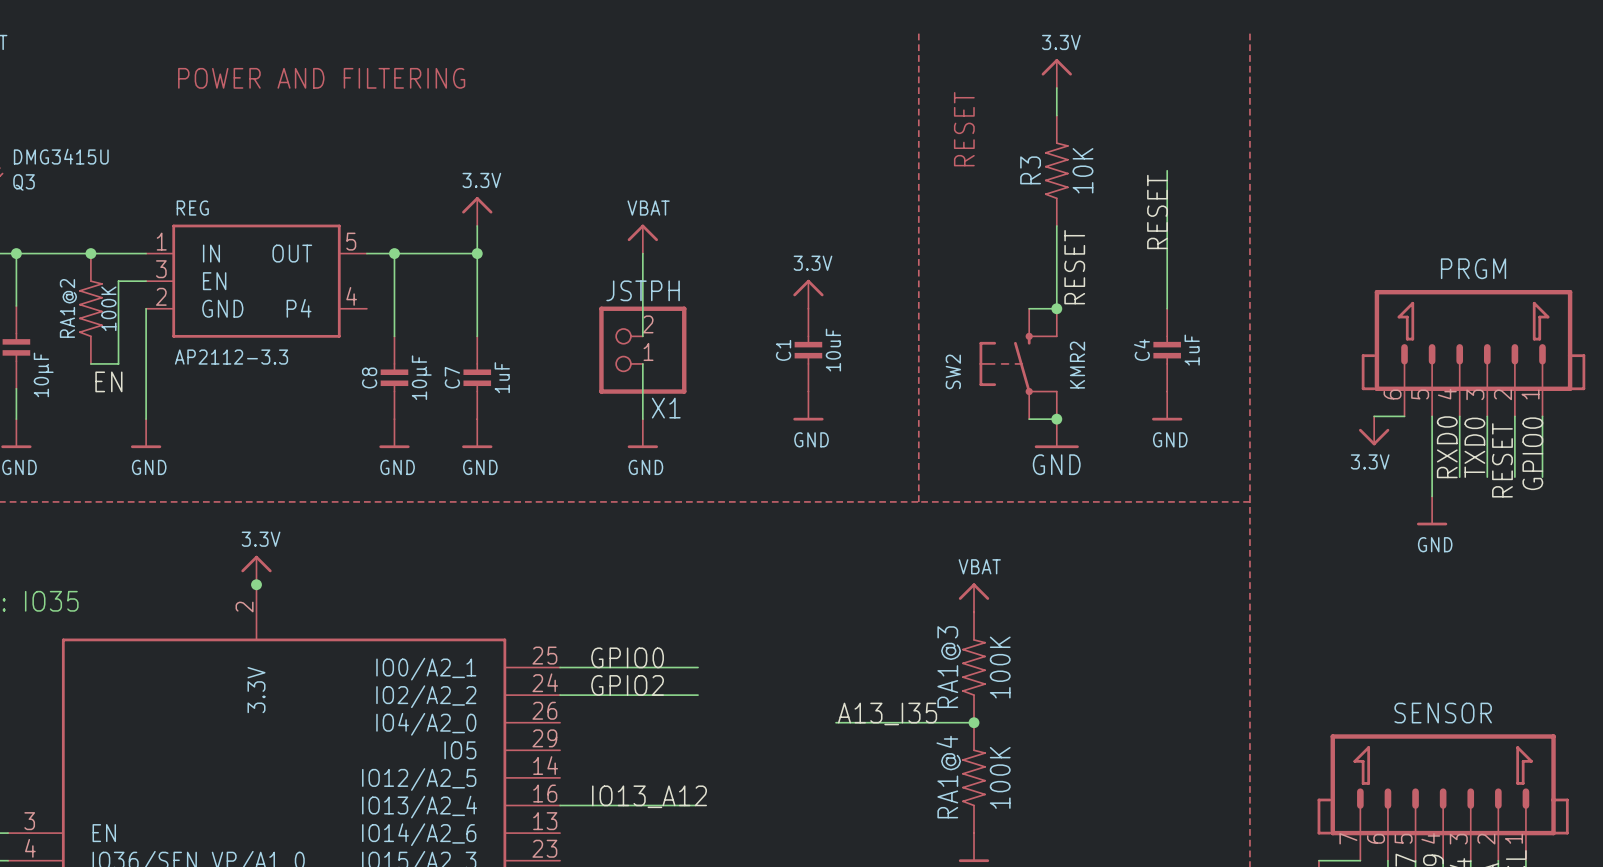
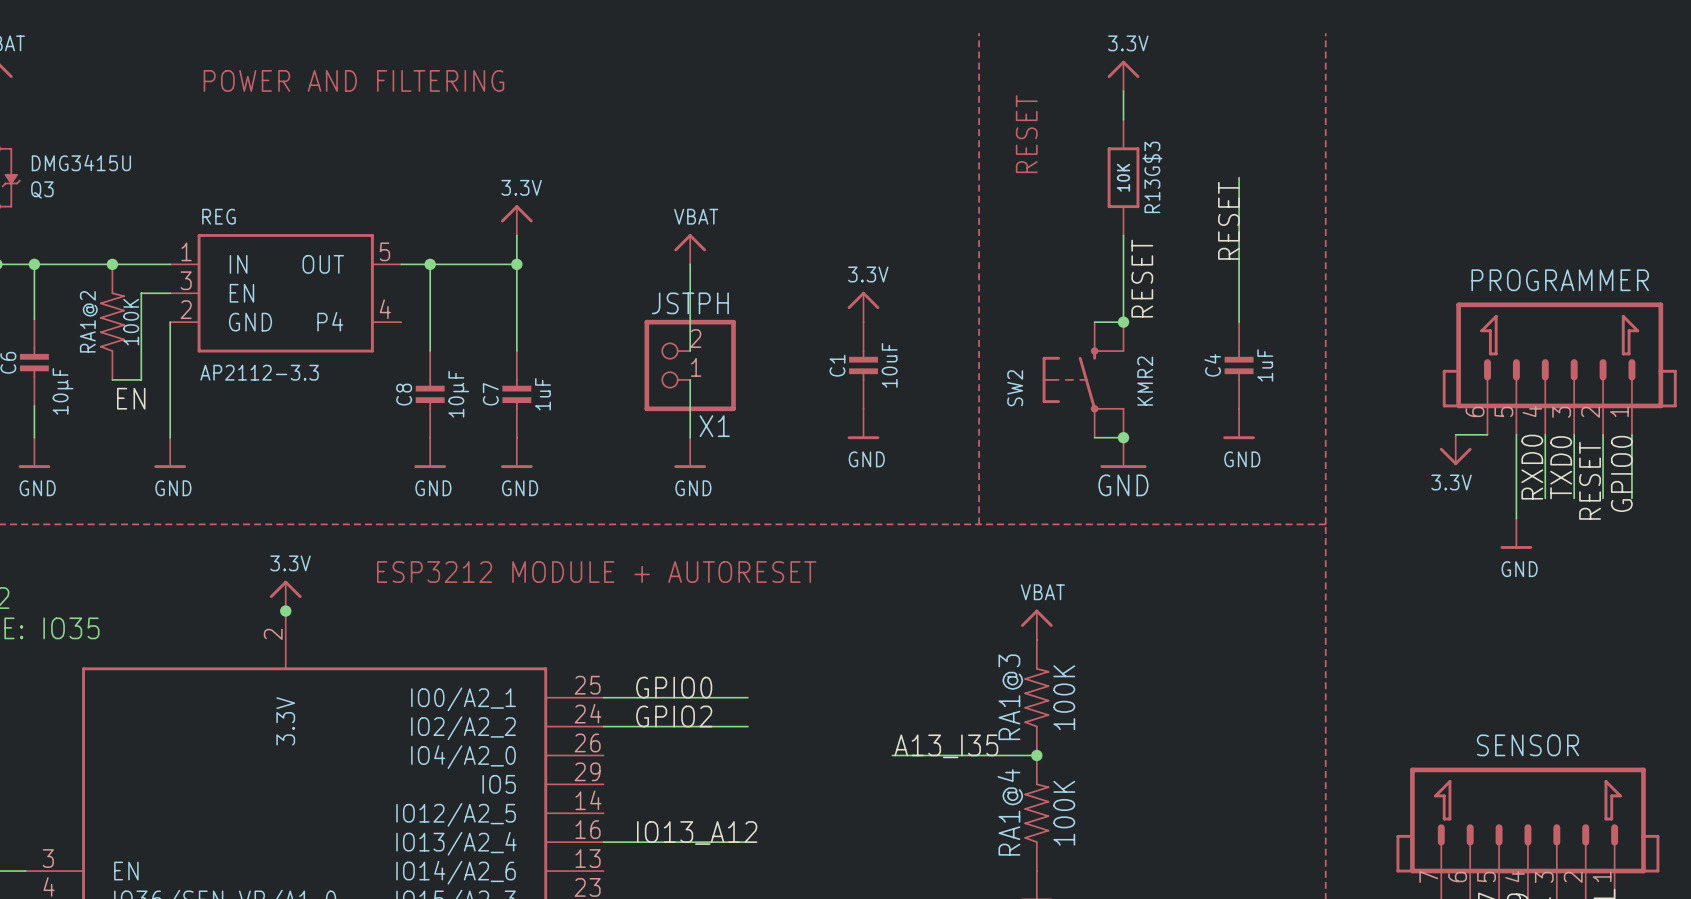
R3: 10K (1056, 170) -> none
R13G$3: none -> 10K (1123, 177)
PRGM name: PRGM (1473, 268) -> PROGRAMMER (1560, 280)
text: none -> ESP3212 MODULE + AUTORESET (596, 572)

